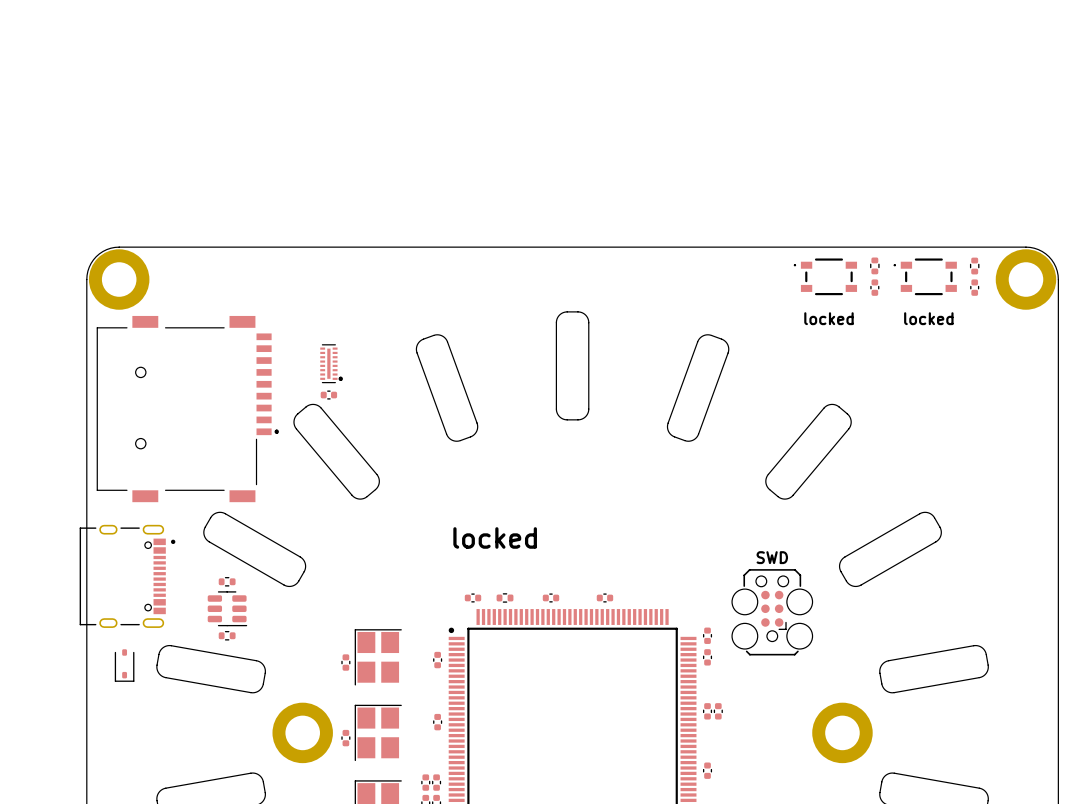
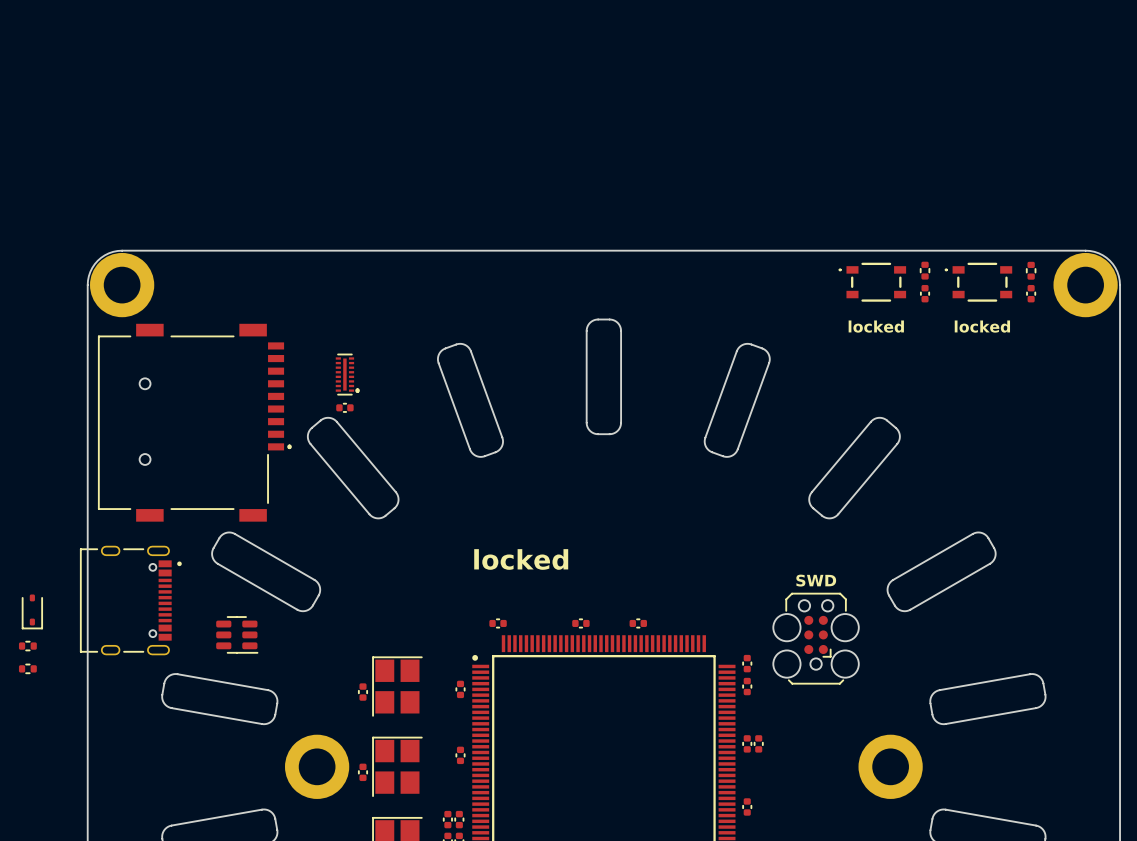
part: (227, 581) -> none
part: (505, 597) -> none
part: none -> (27, 646)
part: (227, 635) -> none
part: none -> (27, 668)
part position: (124, 665) -> (32, 611)

